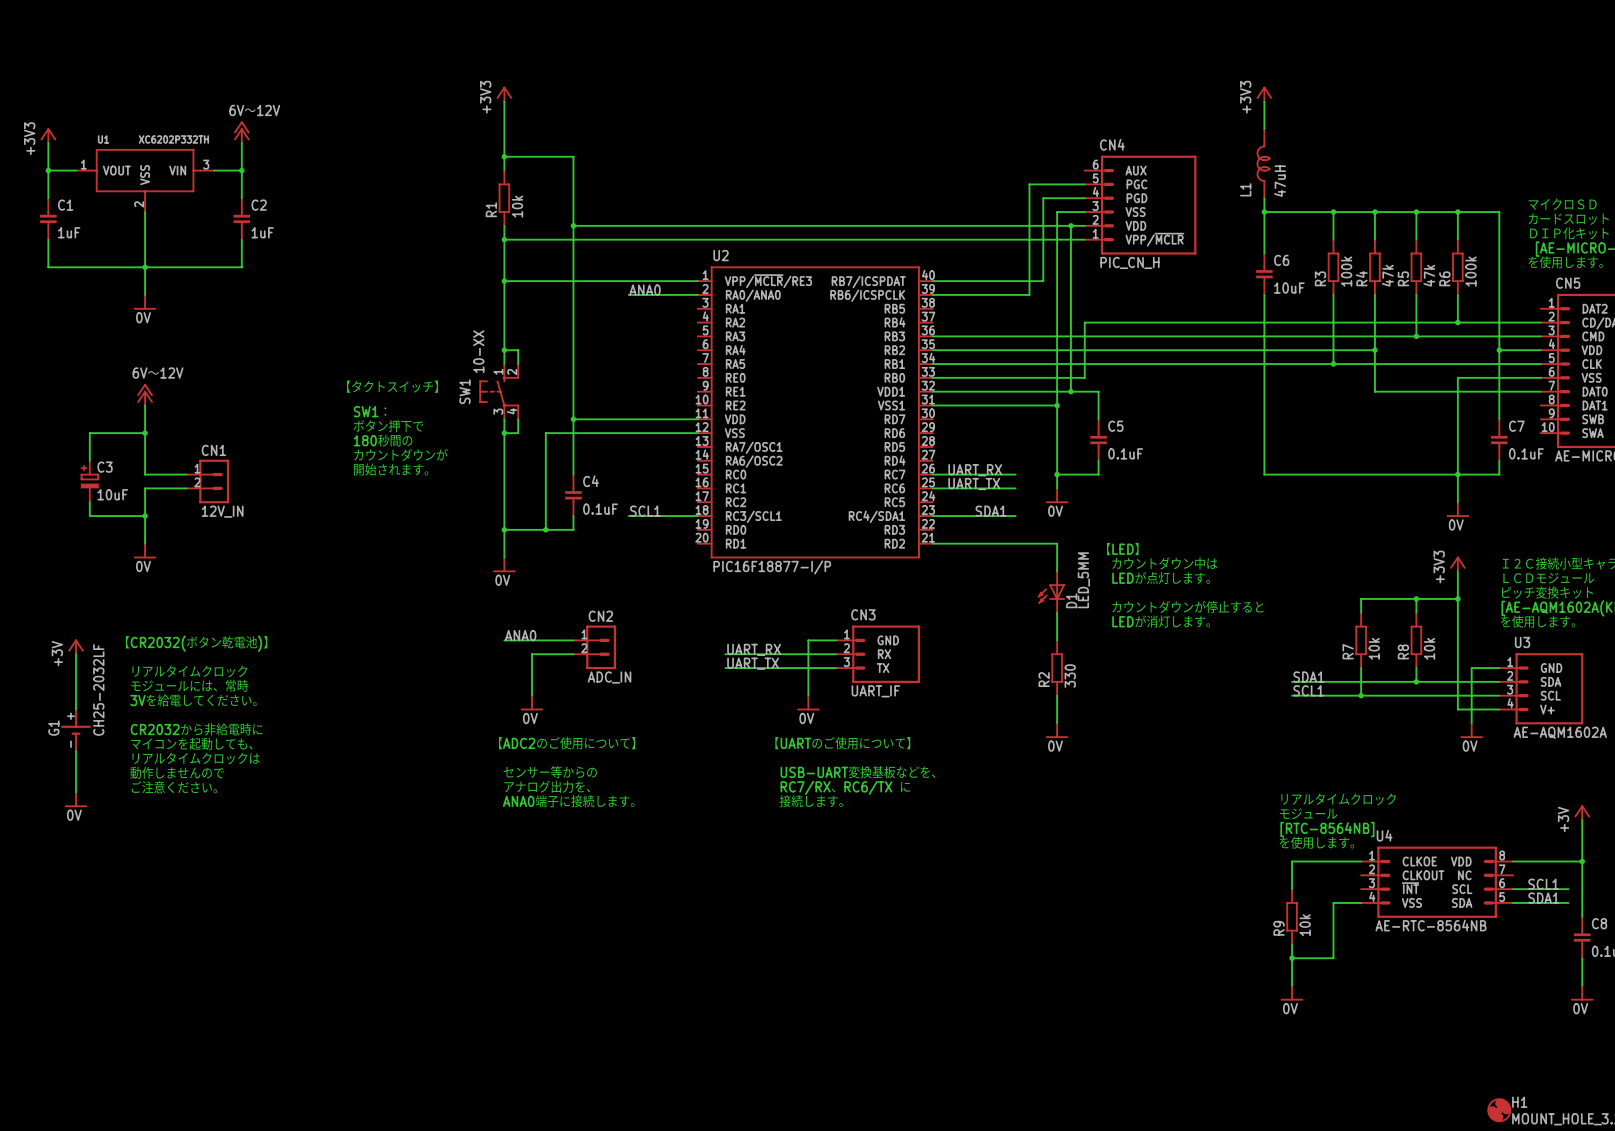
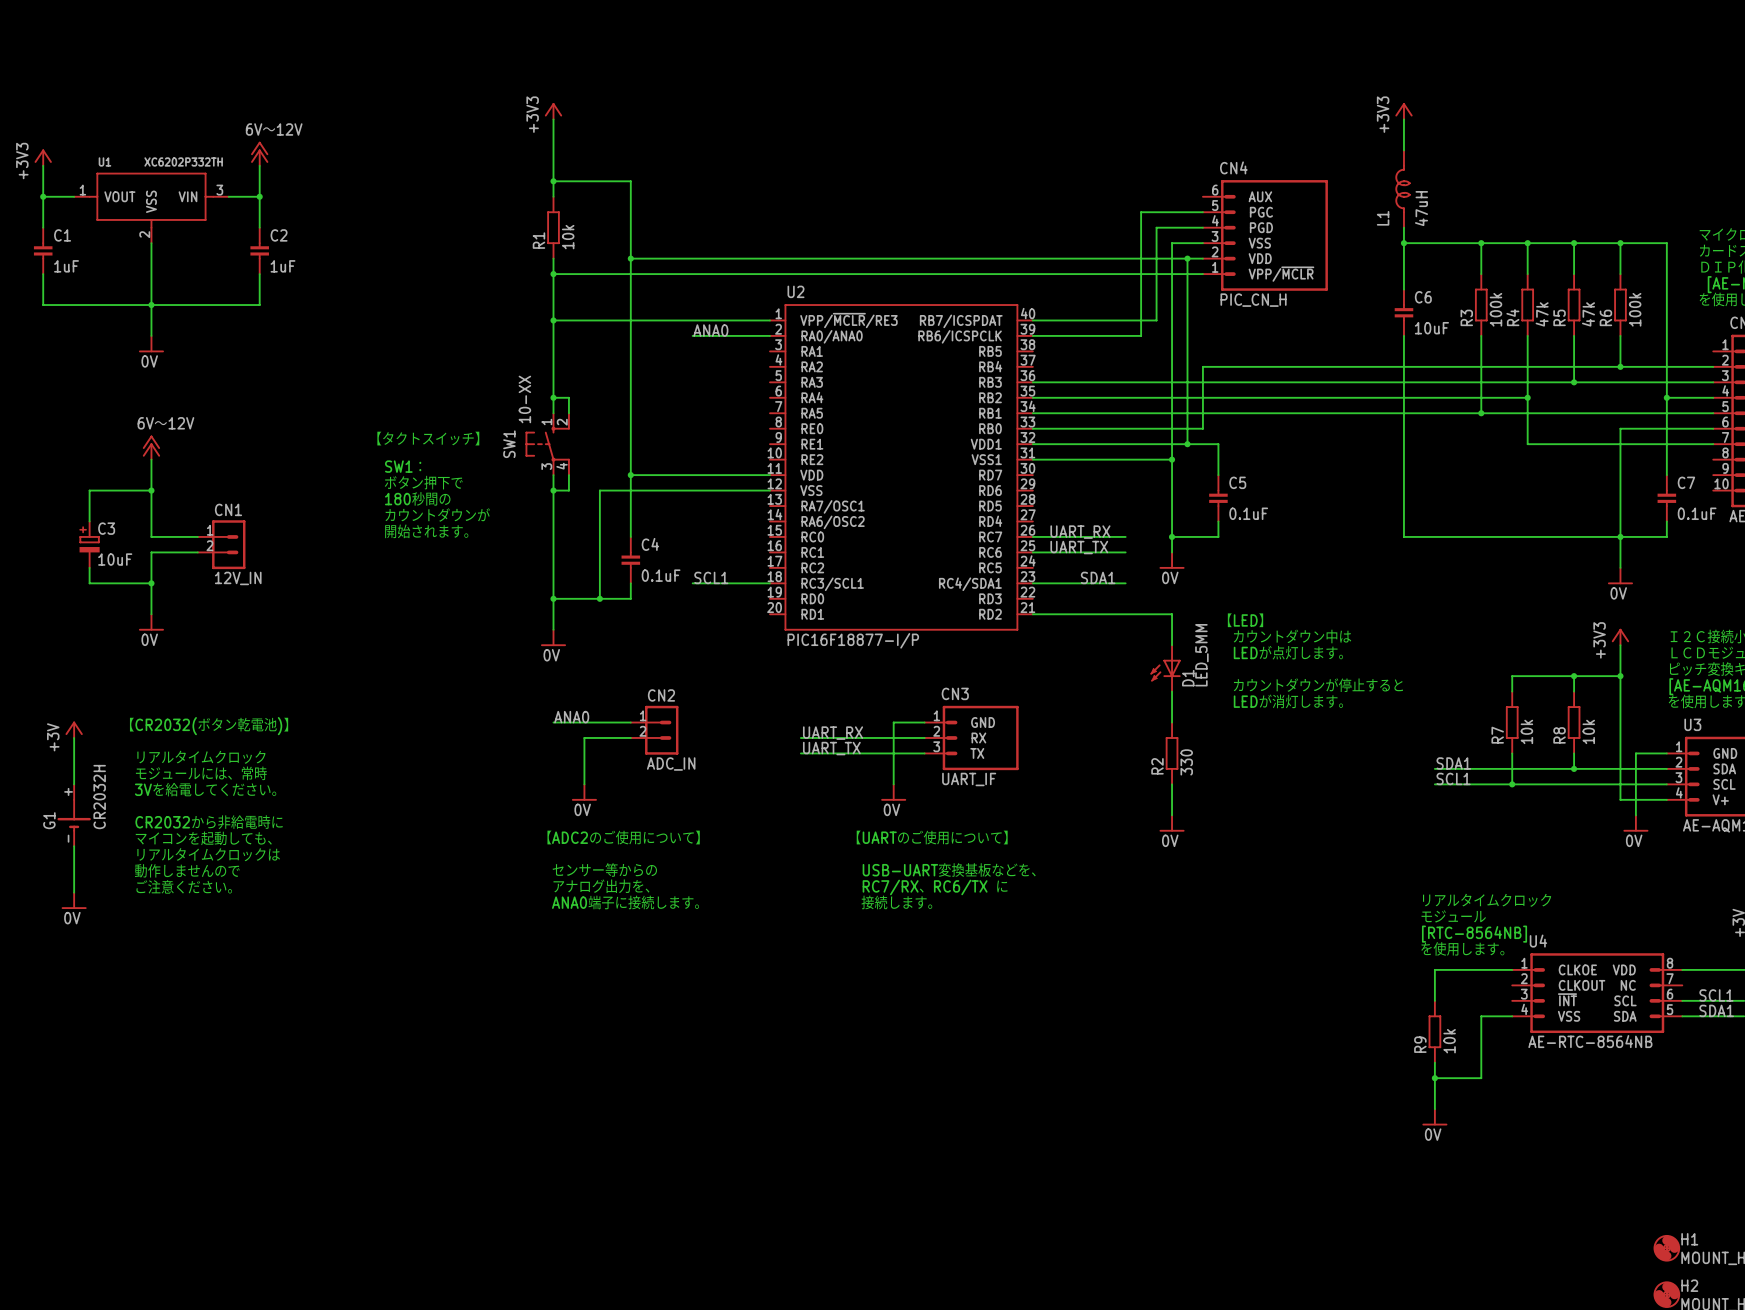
G1 value: CH25-2032LF (98, 689) -> CR2032H (99, 797)
G1 symbol: [61, 709, 91, 751] -> [57, 784, 91, 847]

